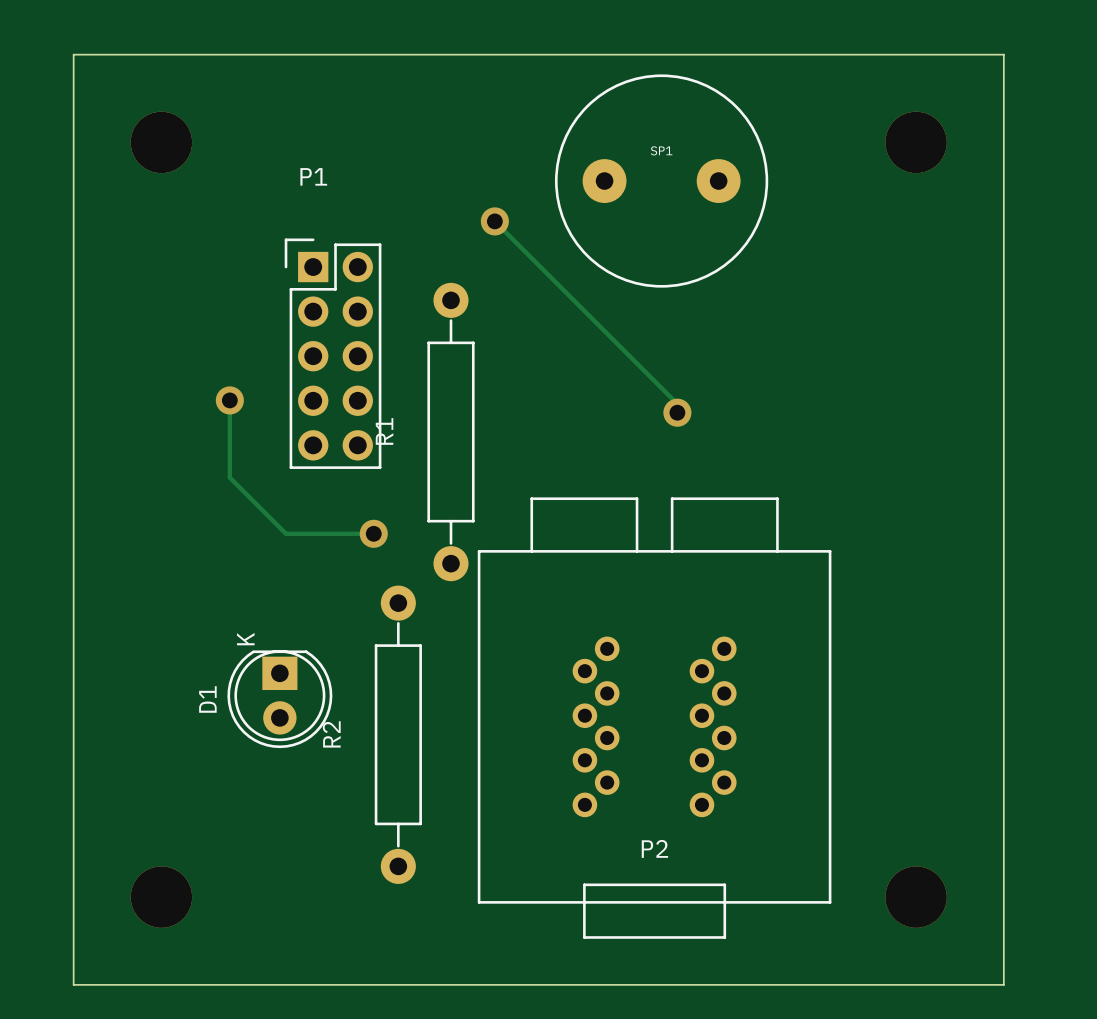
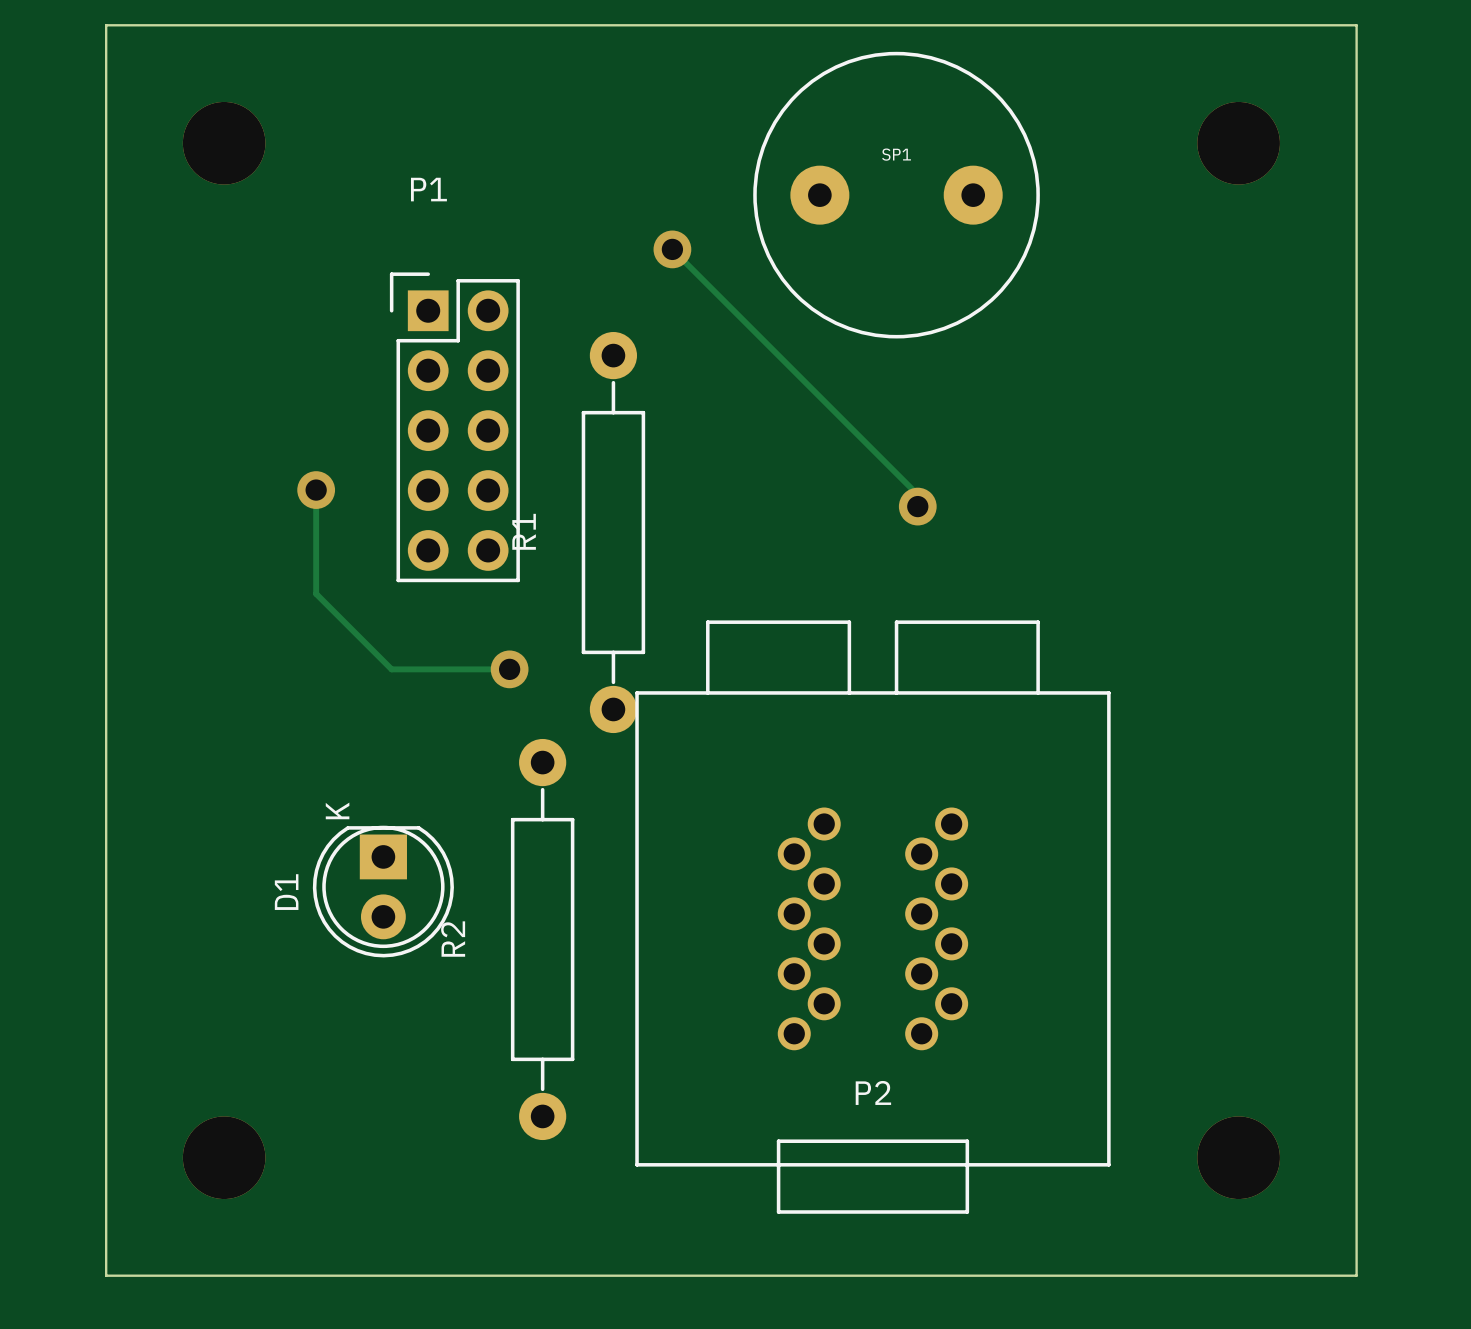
P2 footprint: [477, 497, 832, 939] -> [635, 620, 1111, 1214]

